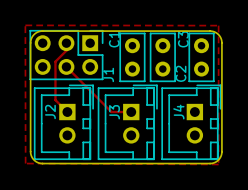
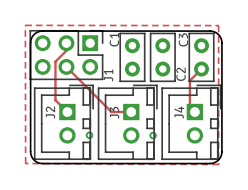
track: none -> (201, 69) (189, 80) (189, 112)
via: none -> (89, 135)
via: none -> (153, 135)

